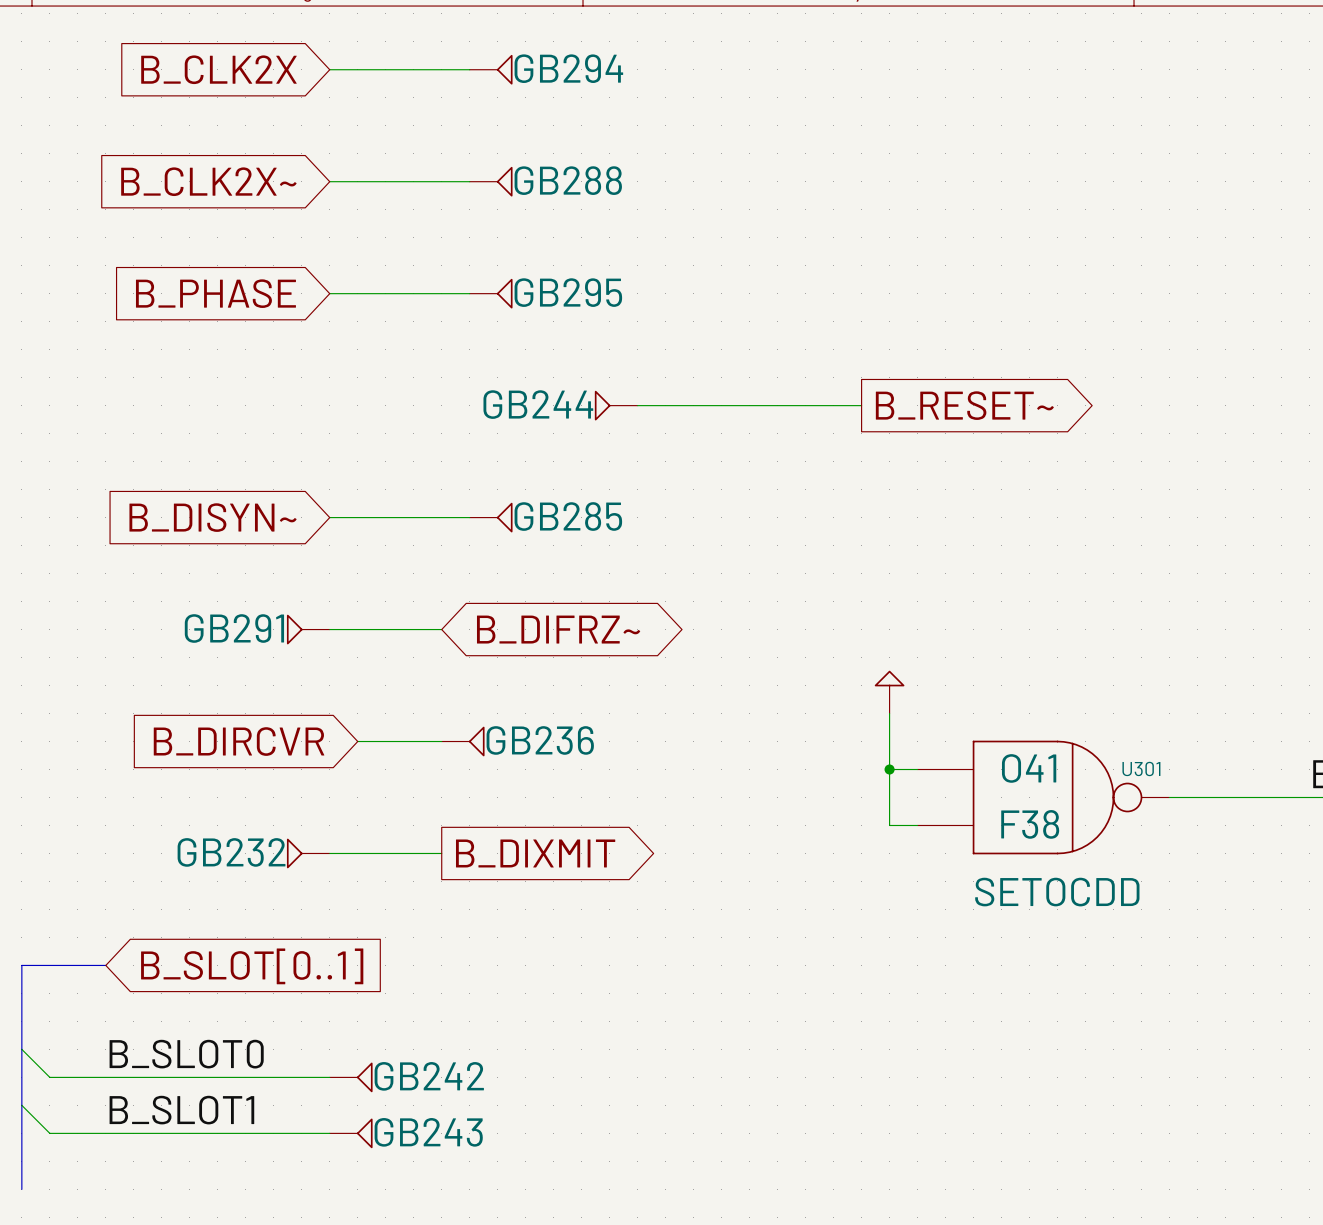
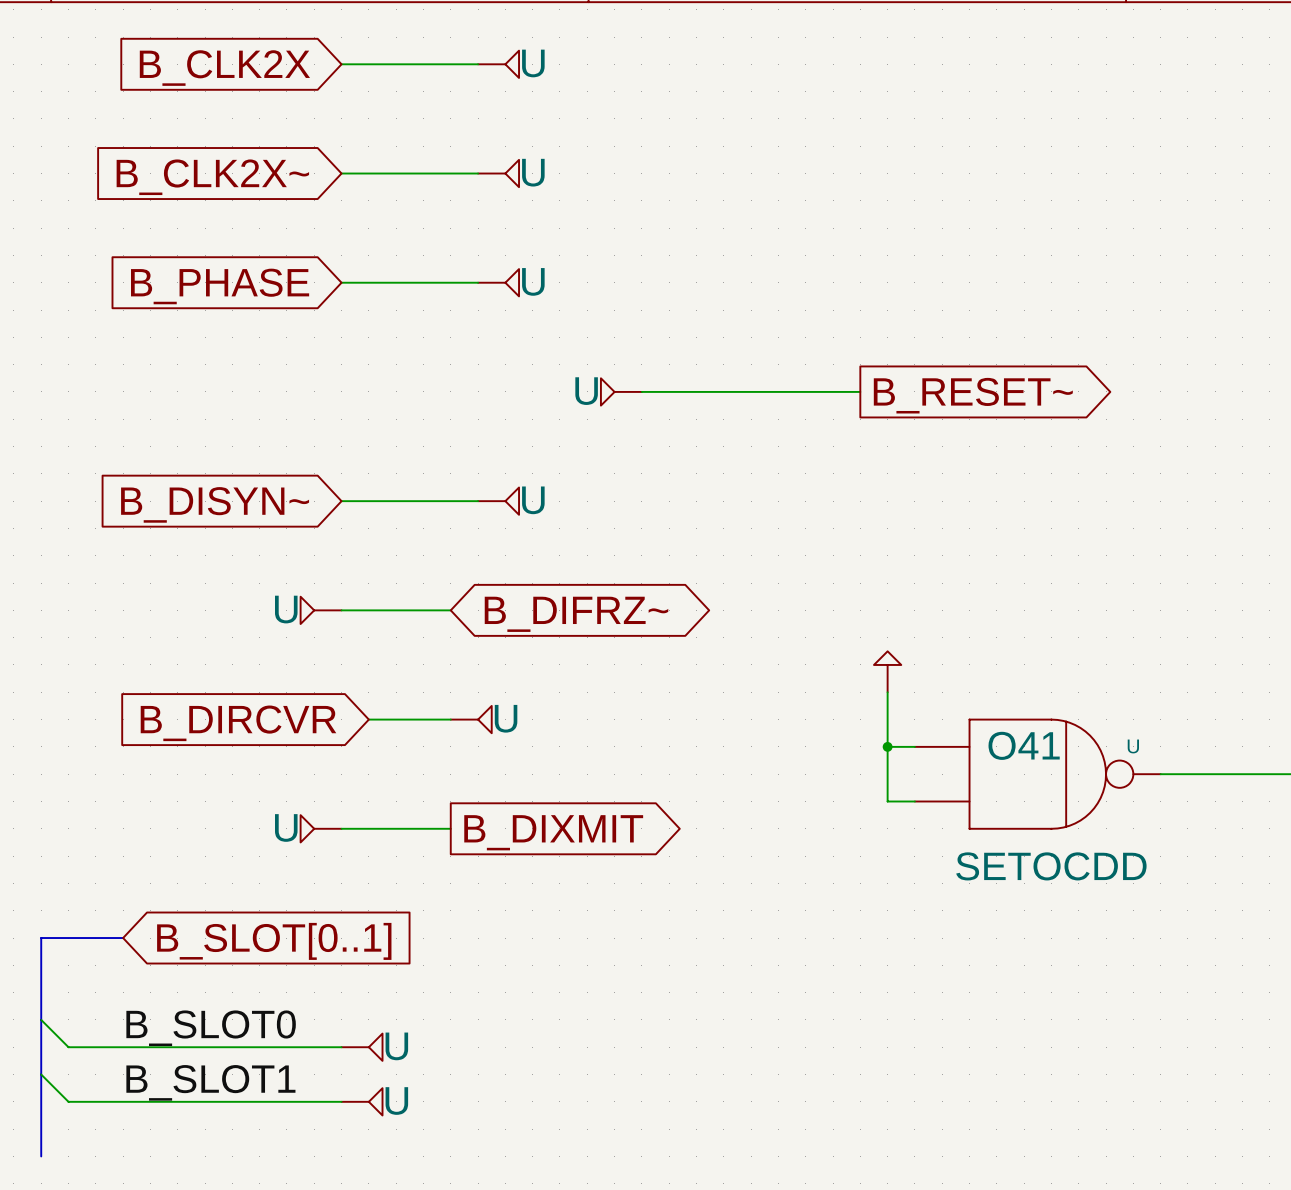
GB294 name: GB294 (568, 68) -> U (533, 63)
GB288 name: GB288 (568, 180) -> U (533, 172)
GB295 name: GB295 (568, 292) -> U (533, 281)
GB244 name: GB244 (538, 404) -> U (586, 391)
GB285 name: GB285 (568, 516) -> U (533, 500)
GB291 name: GB291 (234, 628) -> U (286, 609)
GB236 name: GB236 (540, 740) -> U (506, 718)
U301 name: U301 (1141, 768) -> U (1133, 746)
U301 value: F38 (1030, 824) -> none
GB232 name: GB232 (231, 852) -> U (286, 827)
GB242 name: GB242 (429, 1076) -> U (396, 1046)
GB243 name: GB243 (428, 1132) -> U (396, 1101)

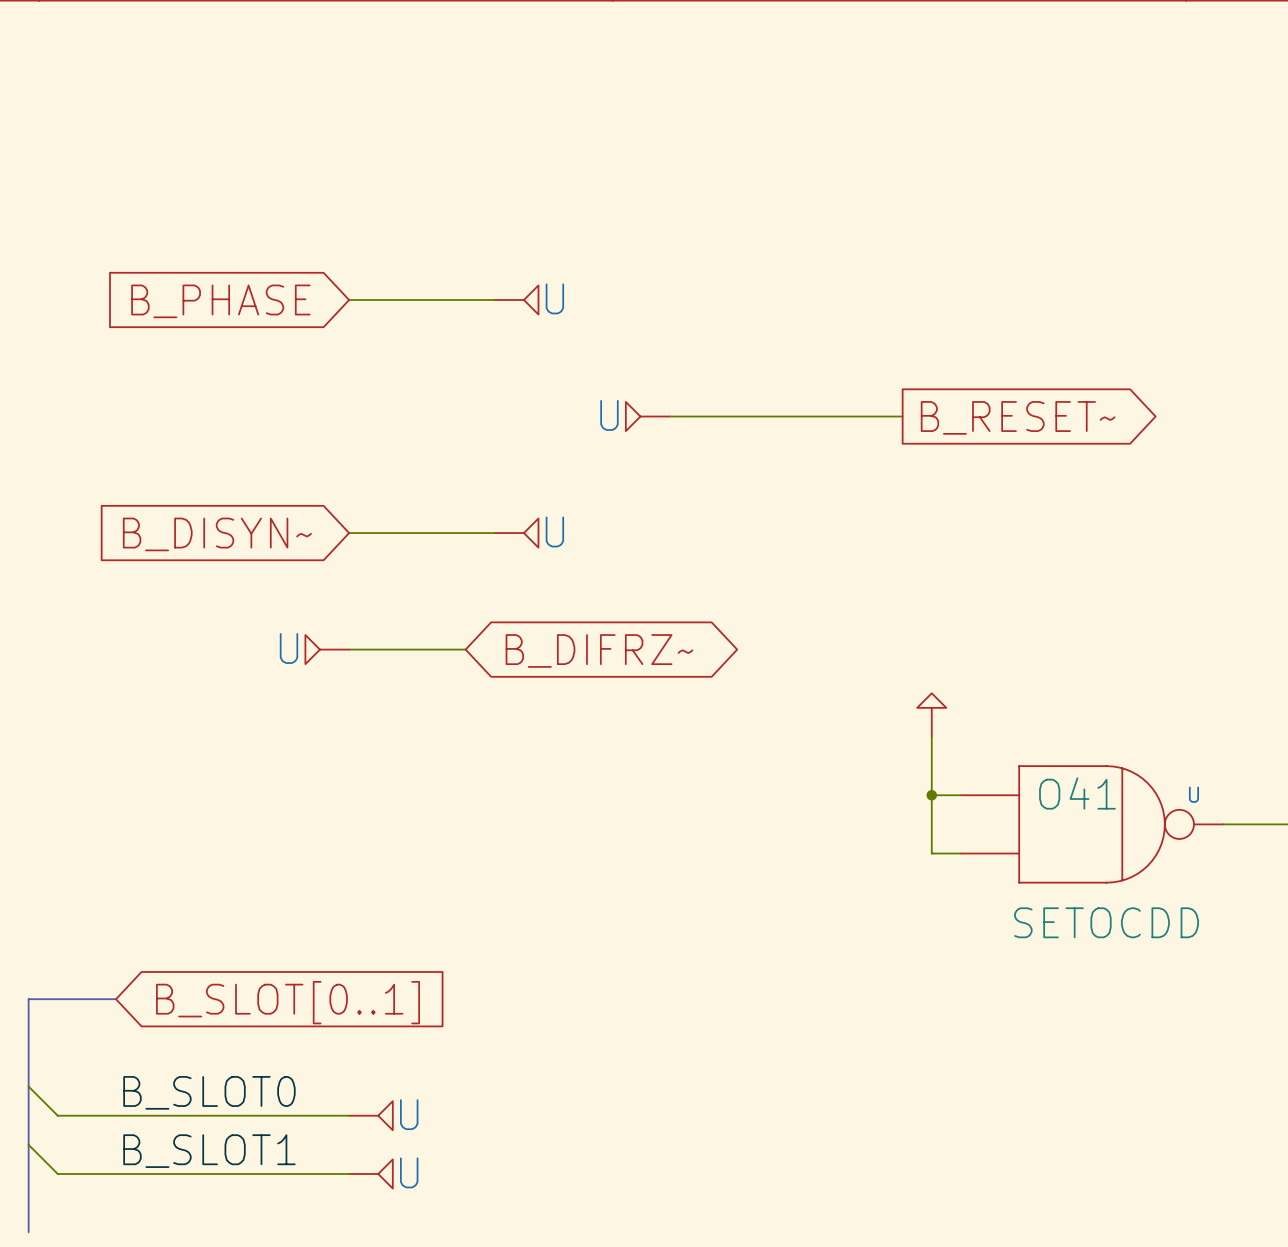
wire: (341, 64) (478, 64) -> none
U: (498, 64) -> none
global label: B_CLK2X (224, 68) -> none
wire: (341, 173) (478, 173) -> none
U: (498, 173) -> none
global label: B_CLK2X~ (212, 177) -> none
wire: (368, 719) (450, 719) -> none
U: (471, 719) -> none
global label: B_DIRCVR (238, 723) -> none
U: (320, 828) -> none
wire: (341, 828) (450, 828) -> none
global label: B_DIXMIT (553, 832) -> none

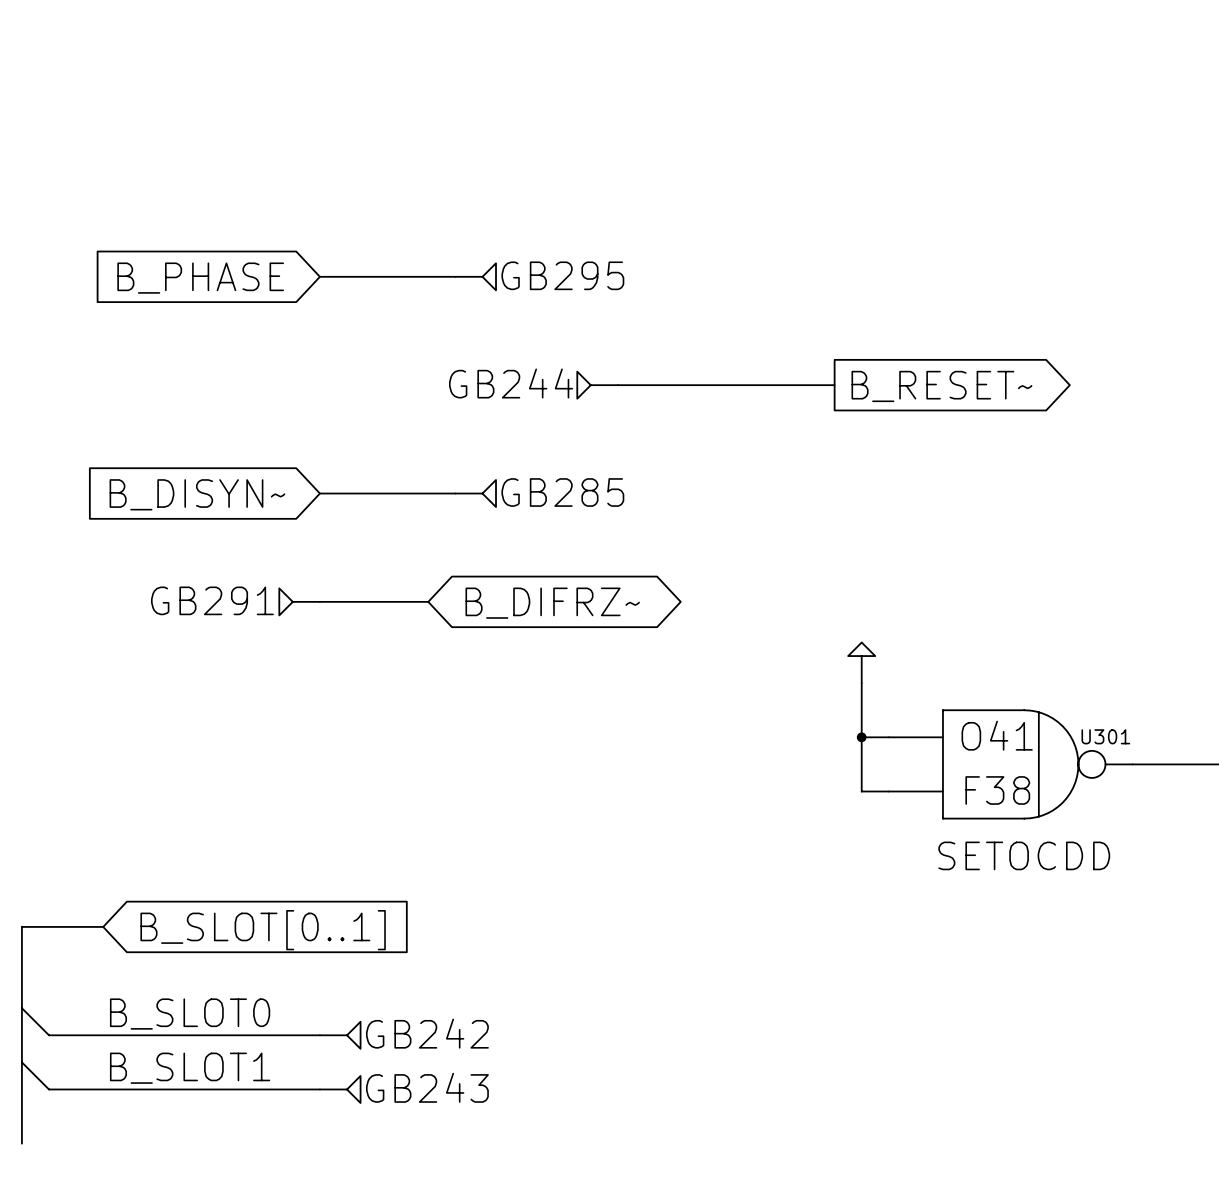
U name: U (554, 298) -> GB295 (562, 275)
U name: U (609, 415) -> GB244 (511, 383)
U name: U (554, 531) -> GB285 (562, 492)
U name: U (289, 648) -> GB291 (212, 600)
U name: U (1193, 794) -> U301 (1105, 736)
U value: none -> F38 (997, 790)
U name: U (409, 1114) -> GB242 (427, 1033)
U name: U (409, 1172) -> GB243 (427, 1087)

